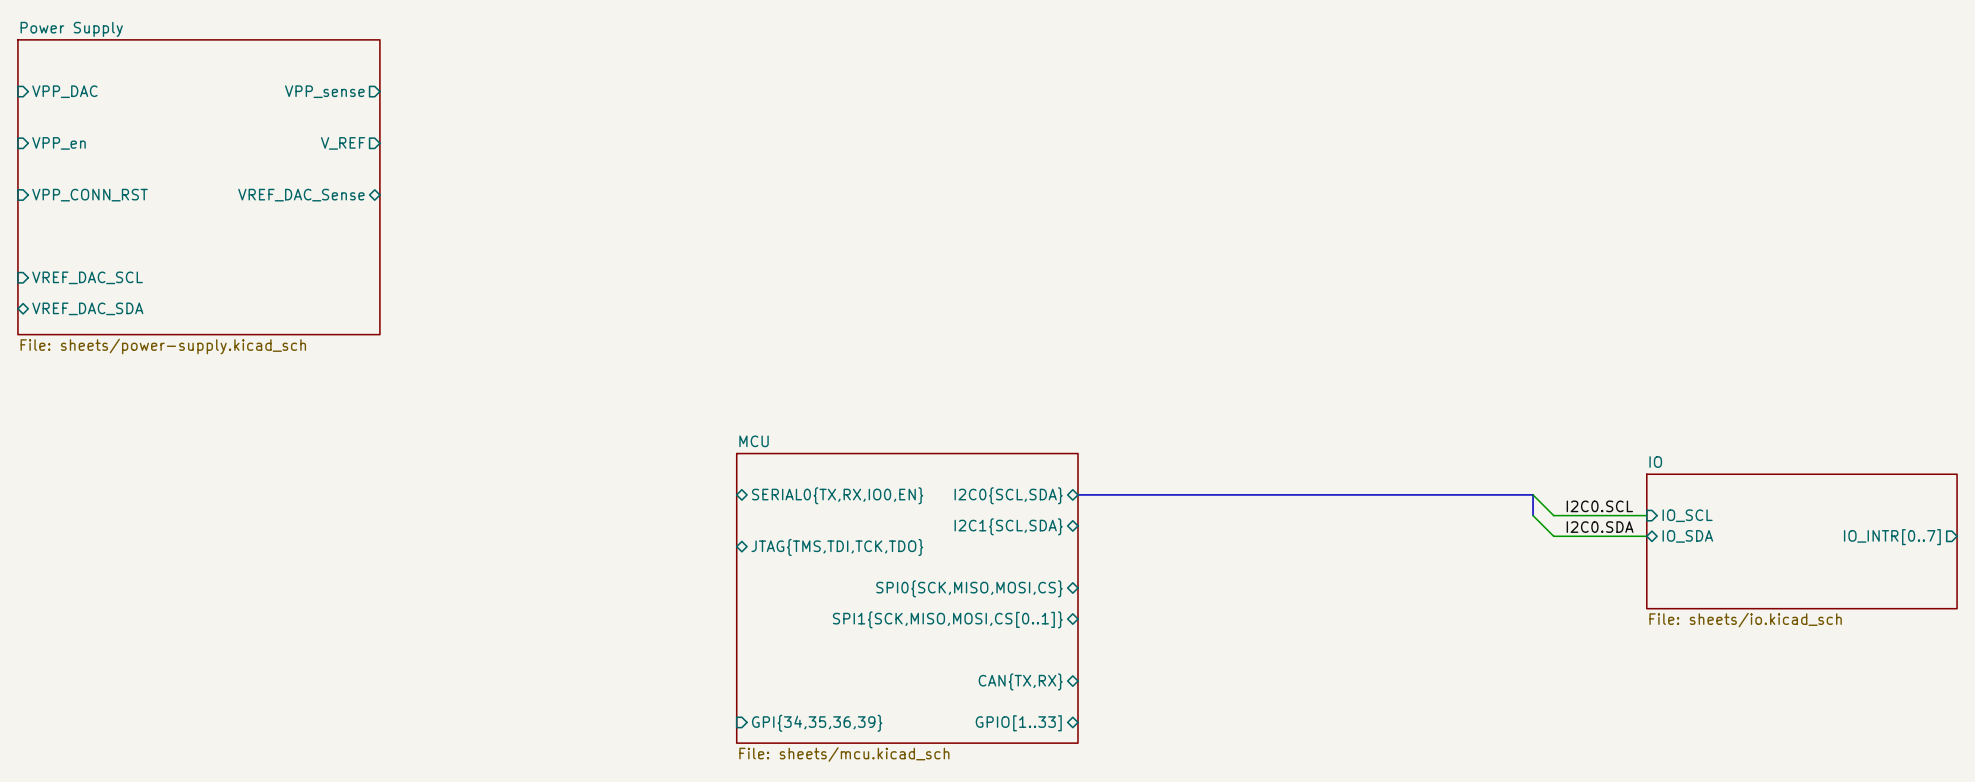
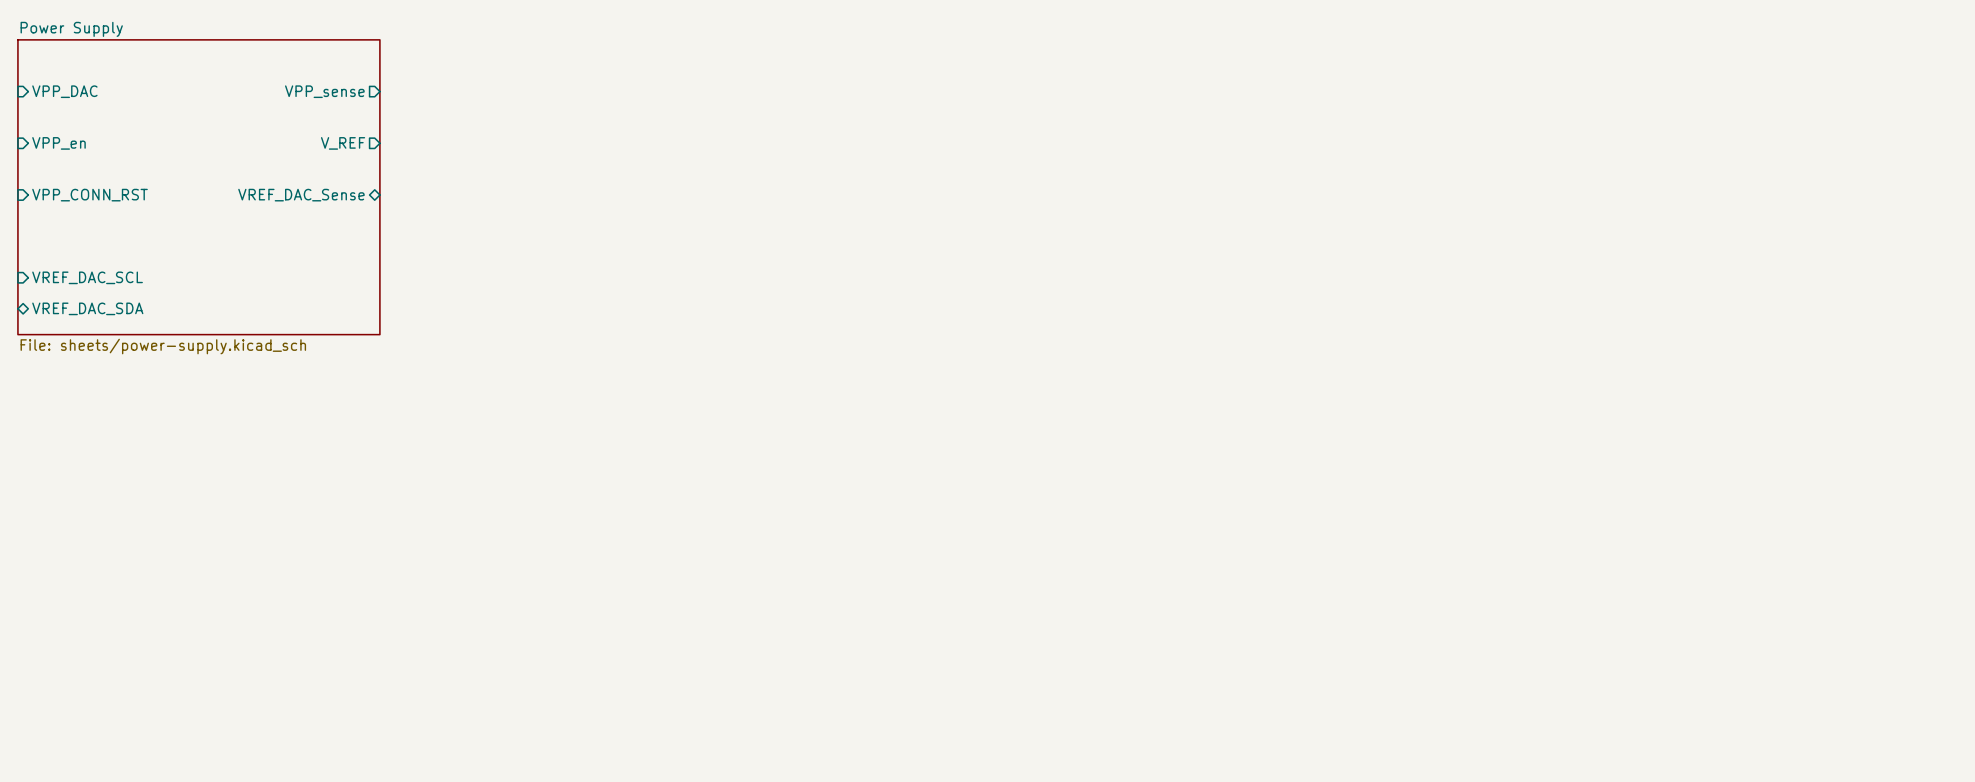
bus: (1077, 494) (1533, 494) (1533, 515) -> none
wire: (1533, 494) (1553, 515) (1646, 515) -> none
sheet pin: SERIAL0{TX,RX,IO0,EN} (837, 495) -> none
sheet pin: I2C0{SCL,SDA} (1008, 495) -> none
label: I2C0.SCL (1599, 506) -> none
wire: (1533, 515) (1553, 536) (1646, 536) -> none
sheet pin: IO_SCL (1687, 515) -> none
sheet pin: I2C1{SCL,SDA} (1008, 526) -> none
label: I2C0.SDA (1600, 527) -> none
sheet pin: IO_SDA (1687, 536) -> none
sheet pin: IO_INTR[0..7] (1892, 537) -> none
sheet IO: File: sheets/io.kicad_sch (1801, 541) -> none
sheet pin: JTAG{TMS,TDI,TCK,TDO} (837, 547) -> none
sheet pin: SPI0{SCK,MISO,MOSI,CS} (969, 588) -> none
sheet MCU: File: sheets/mcu.kicad_sch (907, 598) -> none
sheet pin: SPI1{SCK,MISO,MOSI,CS[0..1]} (947, 619) -> none
sheet pin: CAN{TX,RX} (1020, 681) -> none
sheet pin: GPI{34,35,36,39} (817, 723) -> none
sheet pin: GPIO[1..33] (1018, 723) -> none

